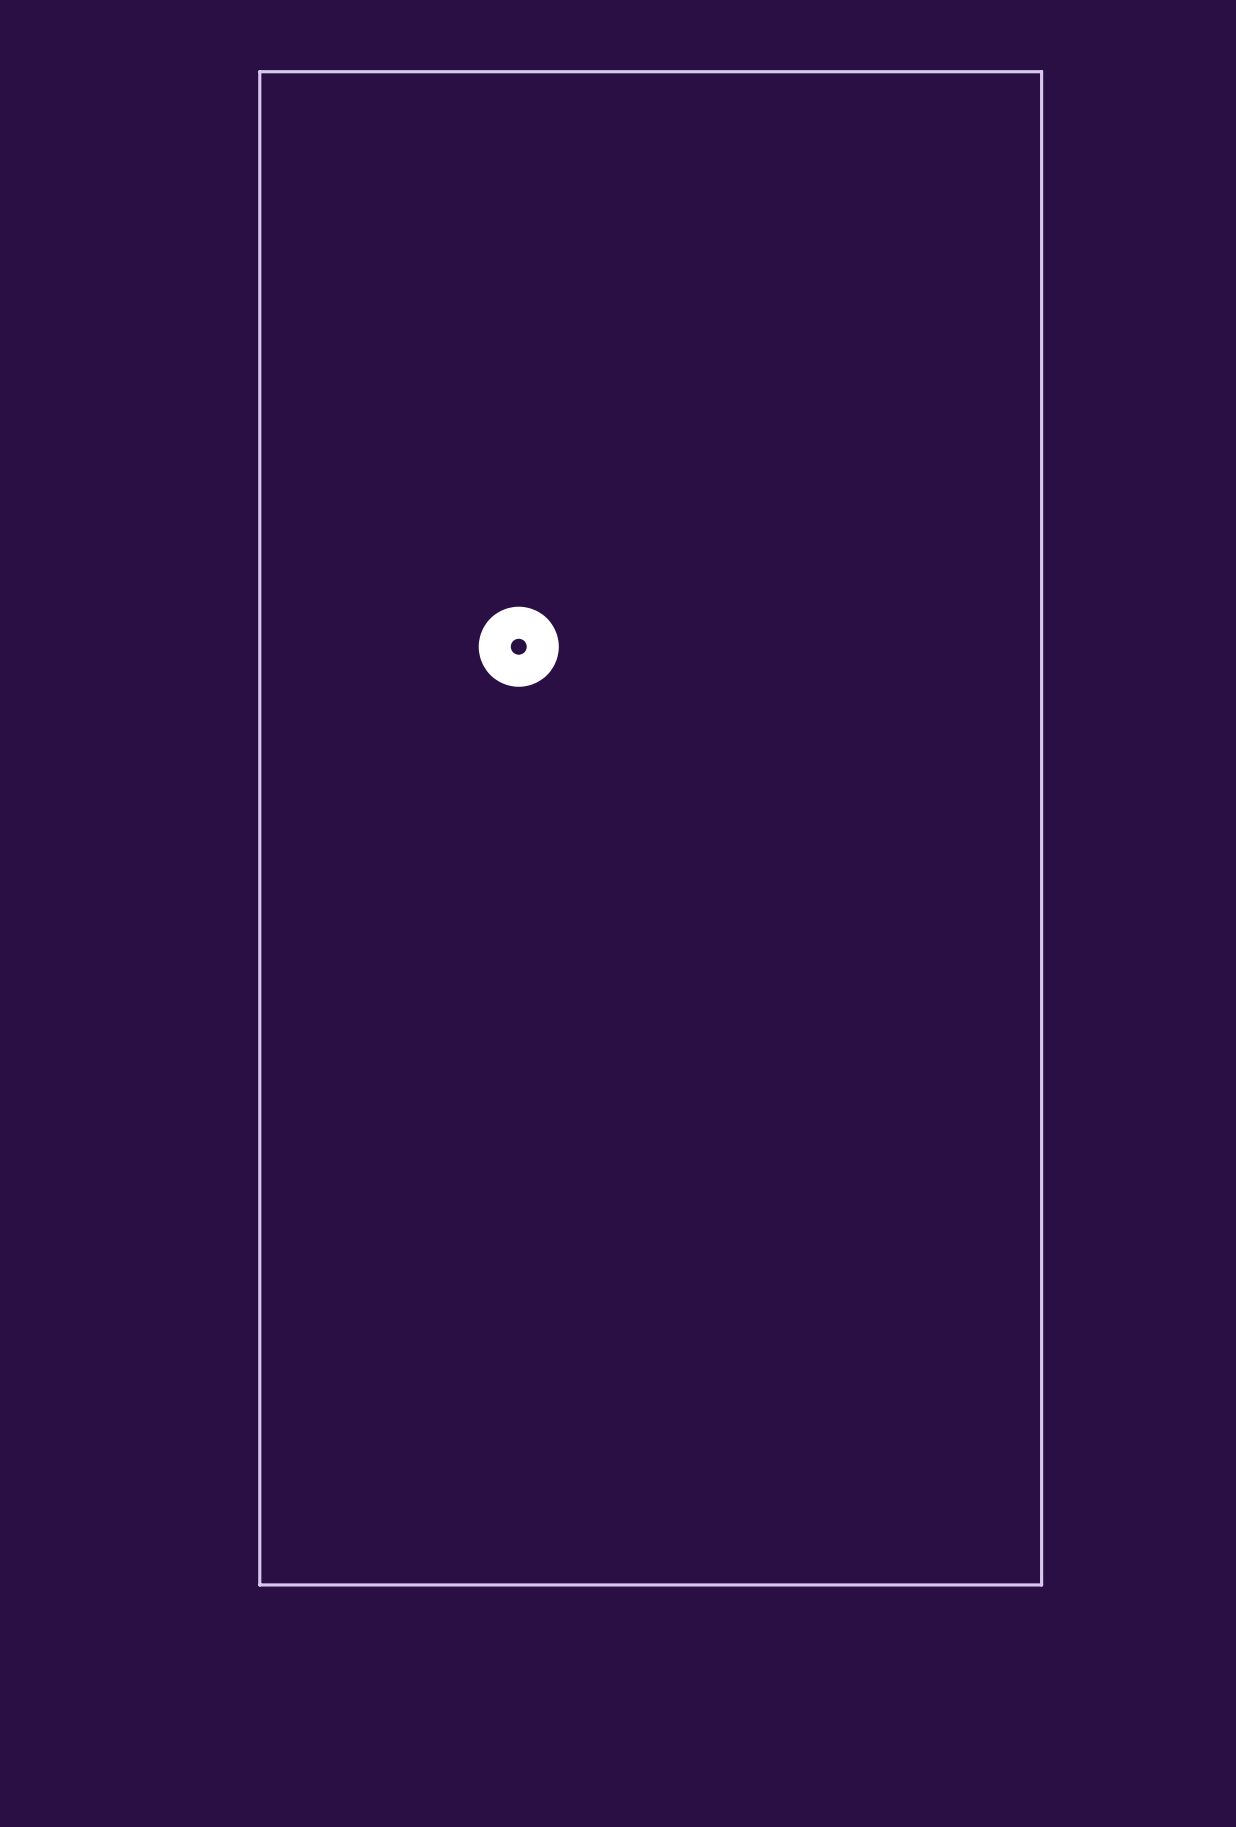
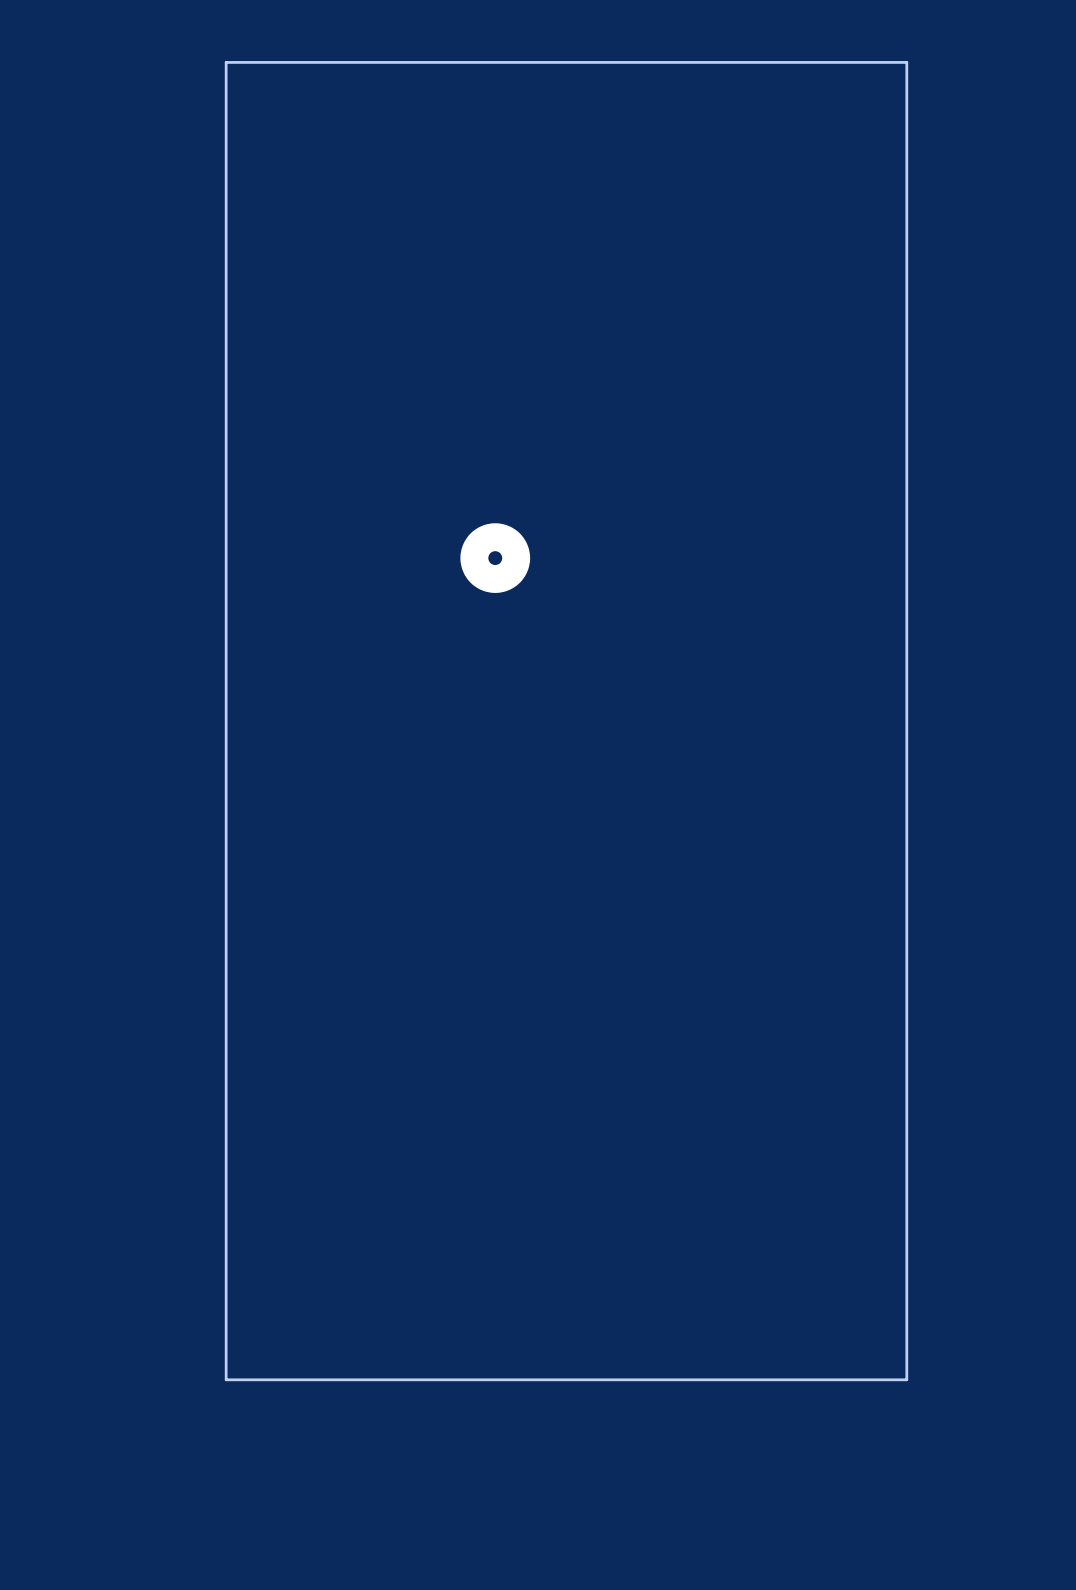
part position: (518, 646) -> (495, 558)

